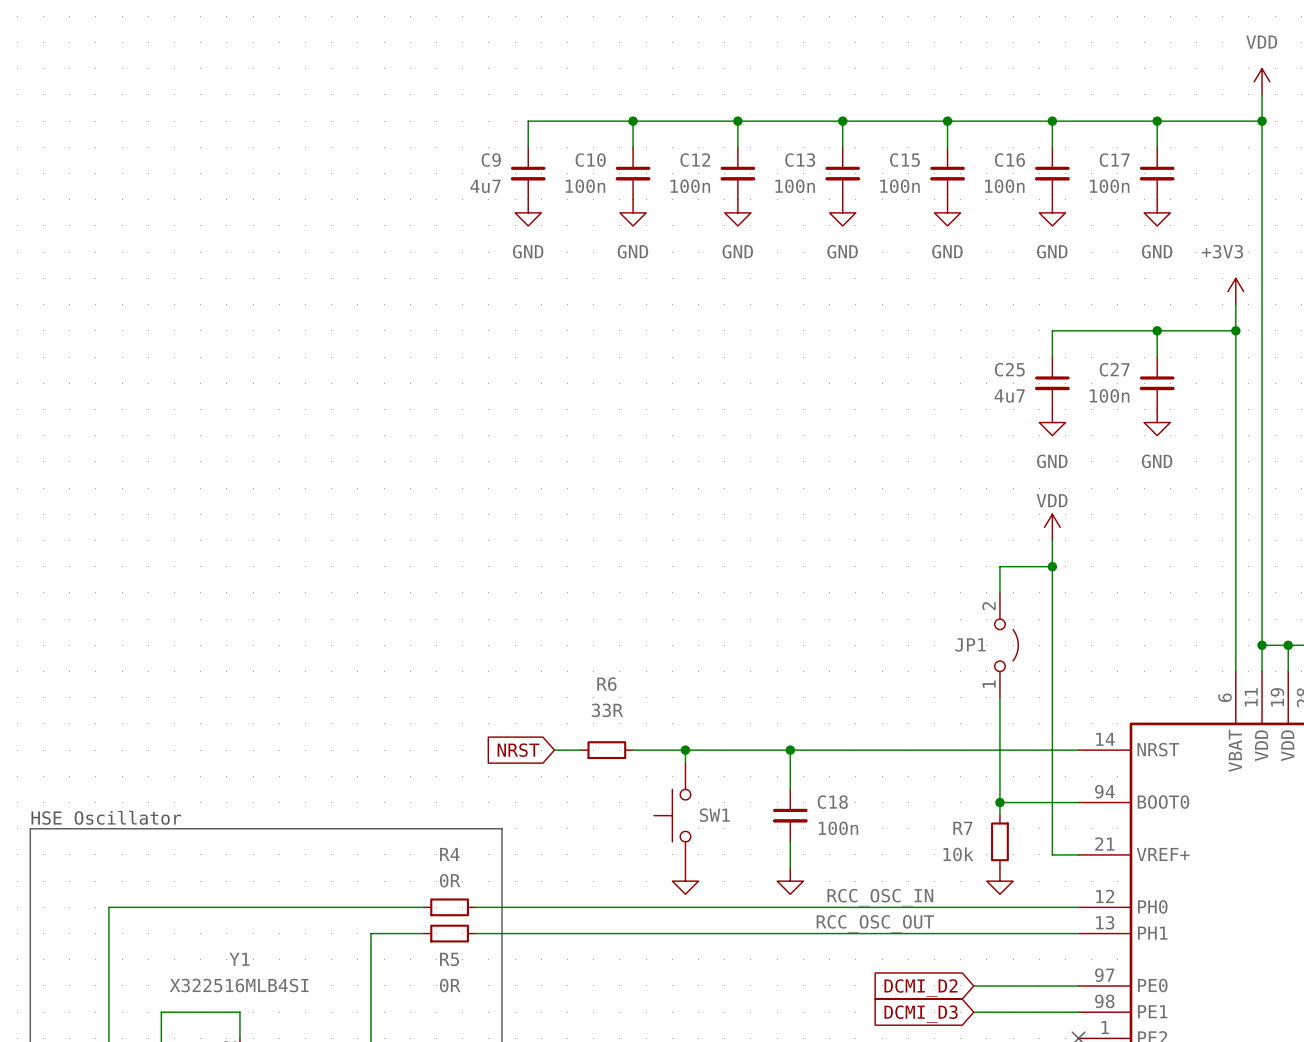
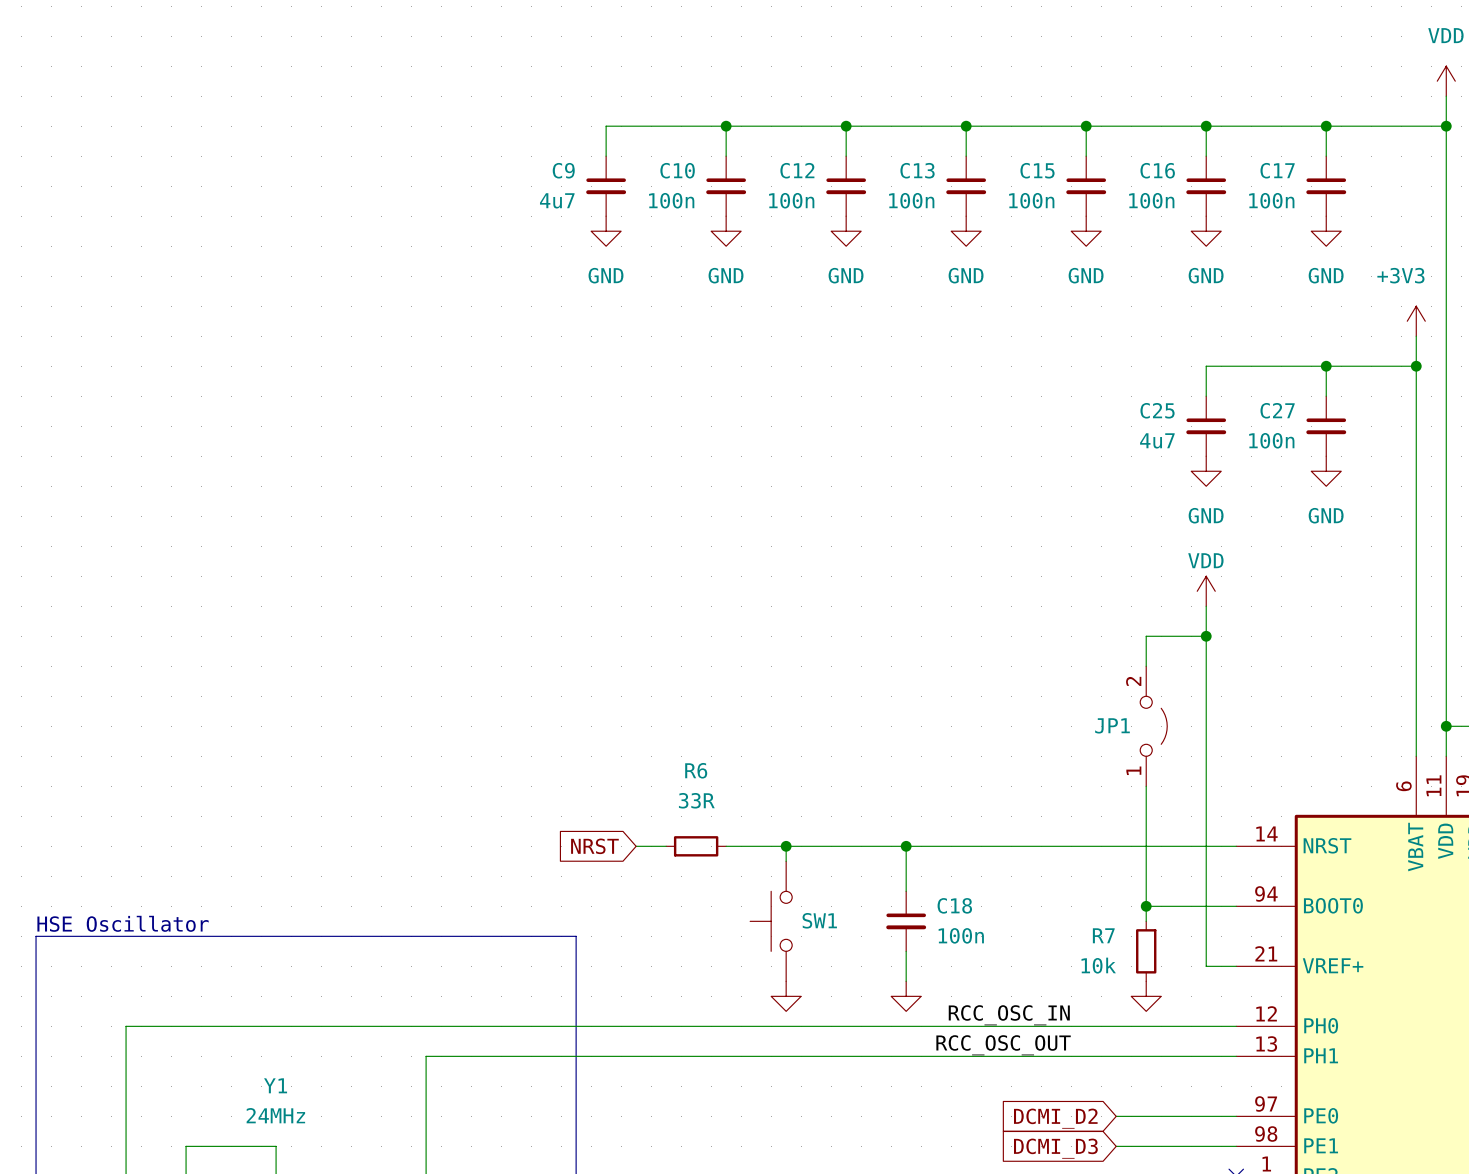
wire: none -> (486, 1026) (546, 1026)
R4: 0R (449, 907) -> none
wire: none -> (486, 1056) (546, 1056)
R5: 0R (449, 933) -> none
Y1 value: X322516MLB4SI (239, 985) -> 24MHz (275, 1115)

